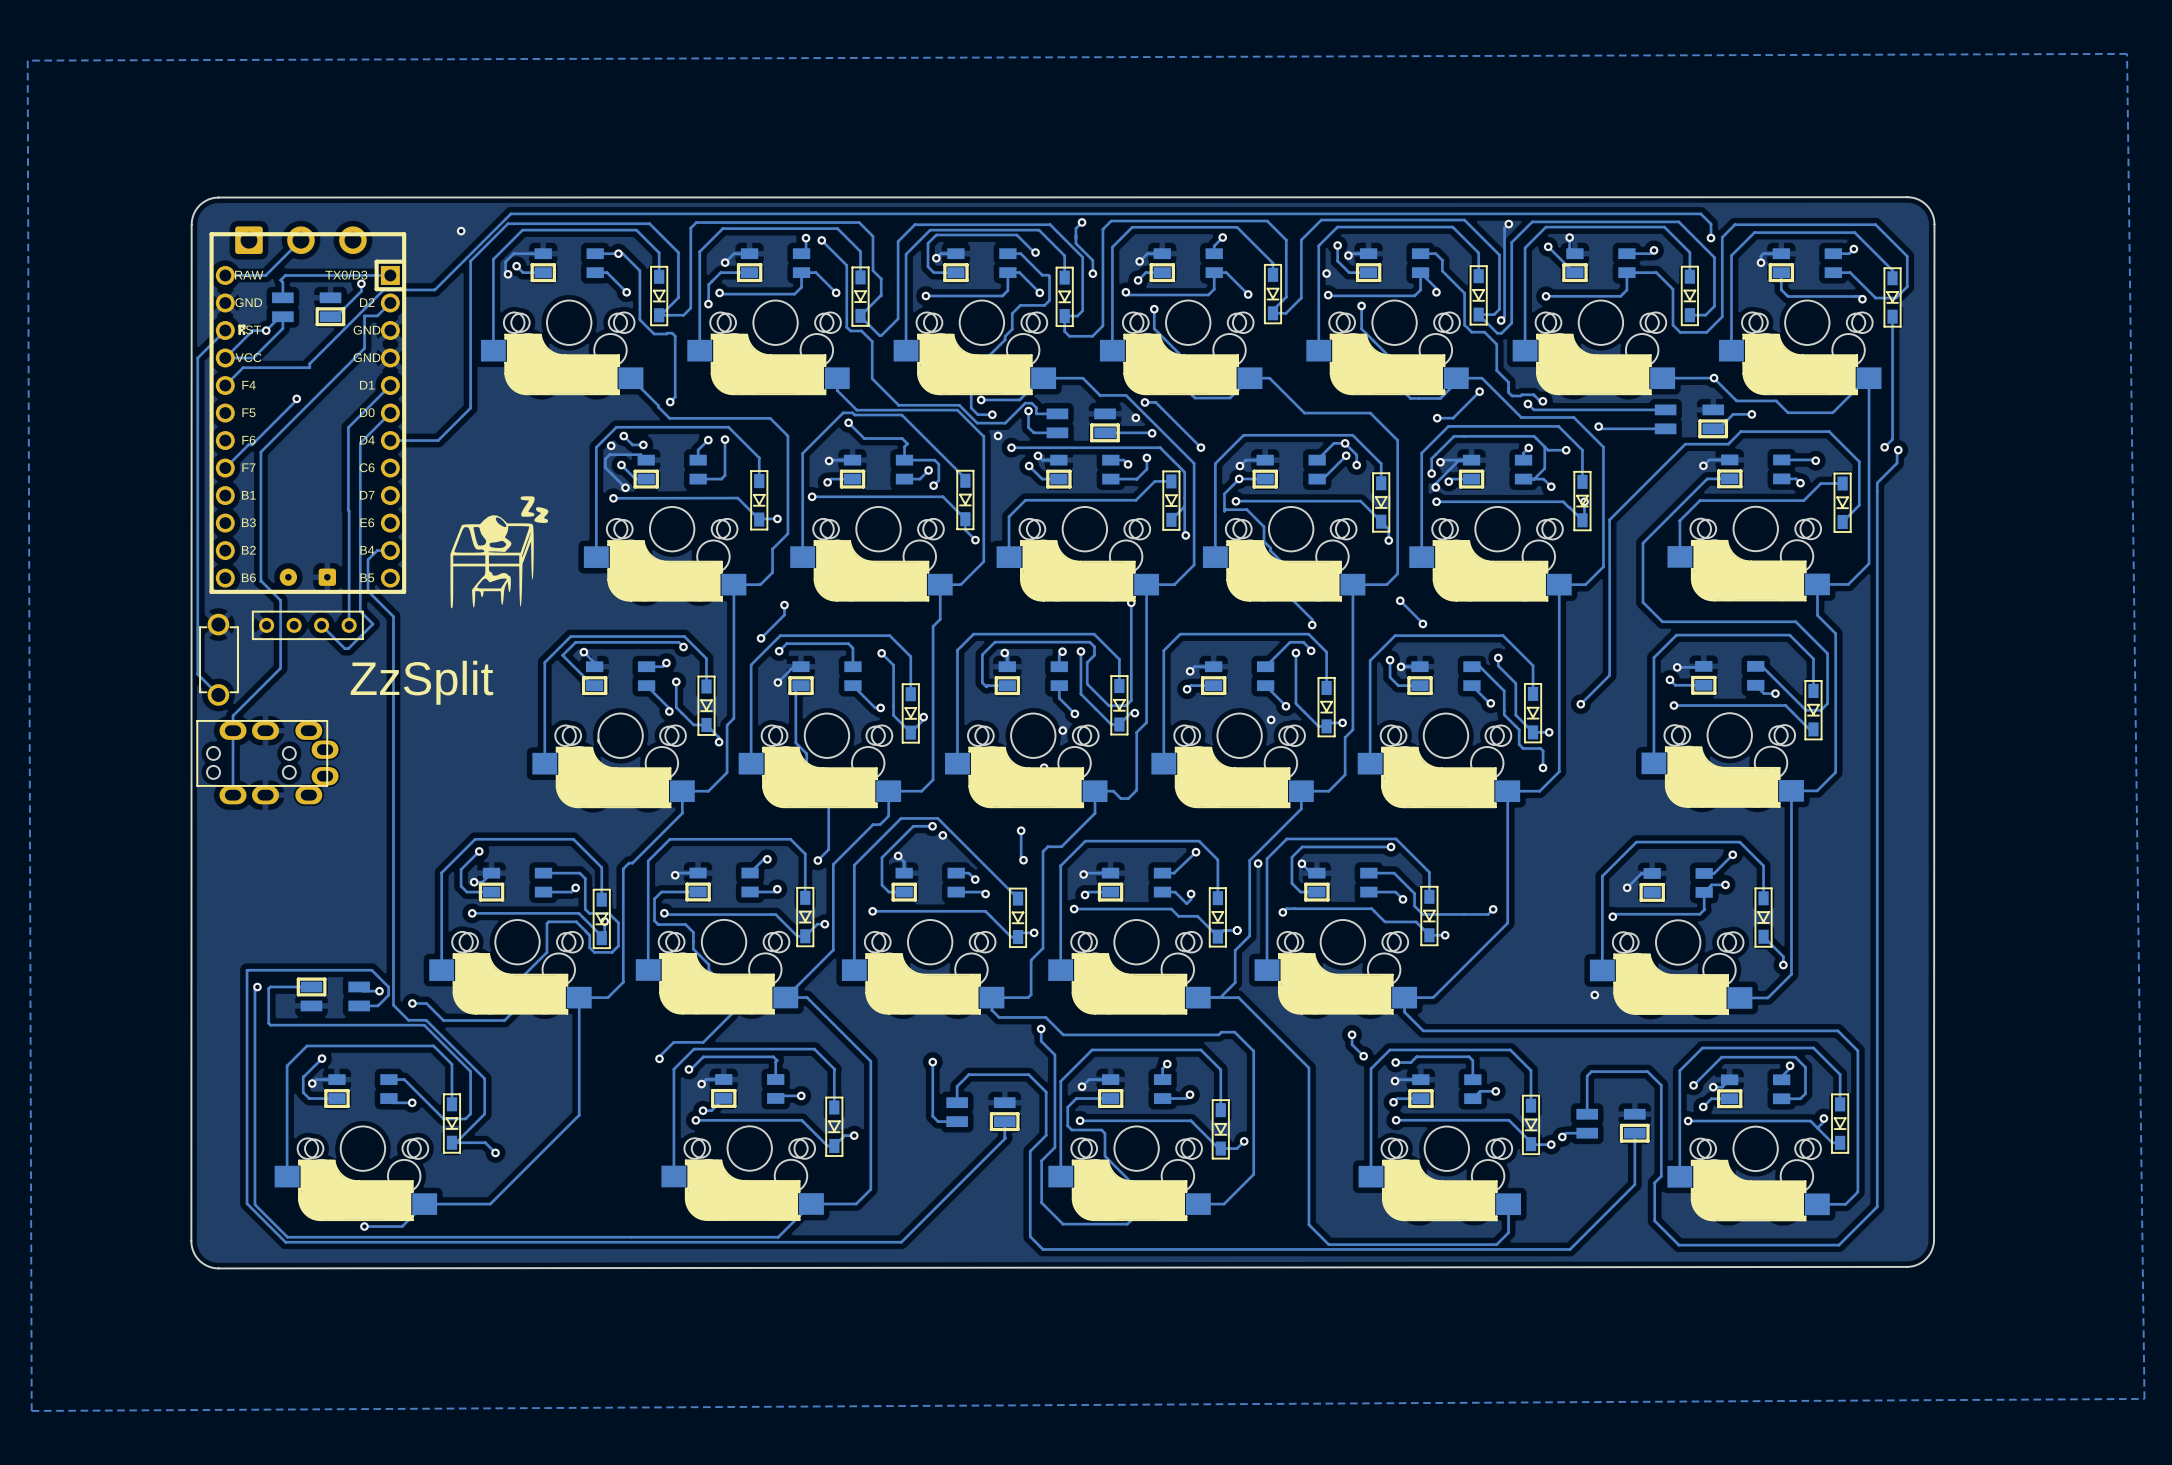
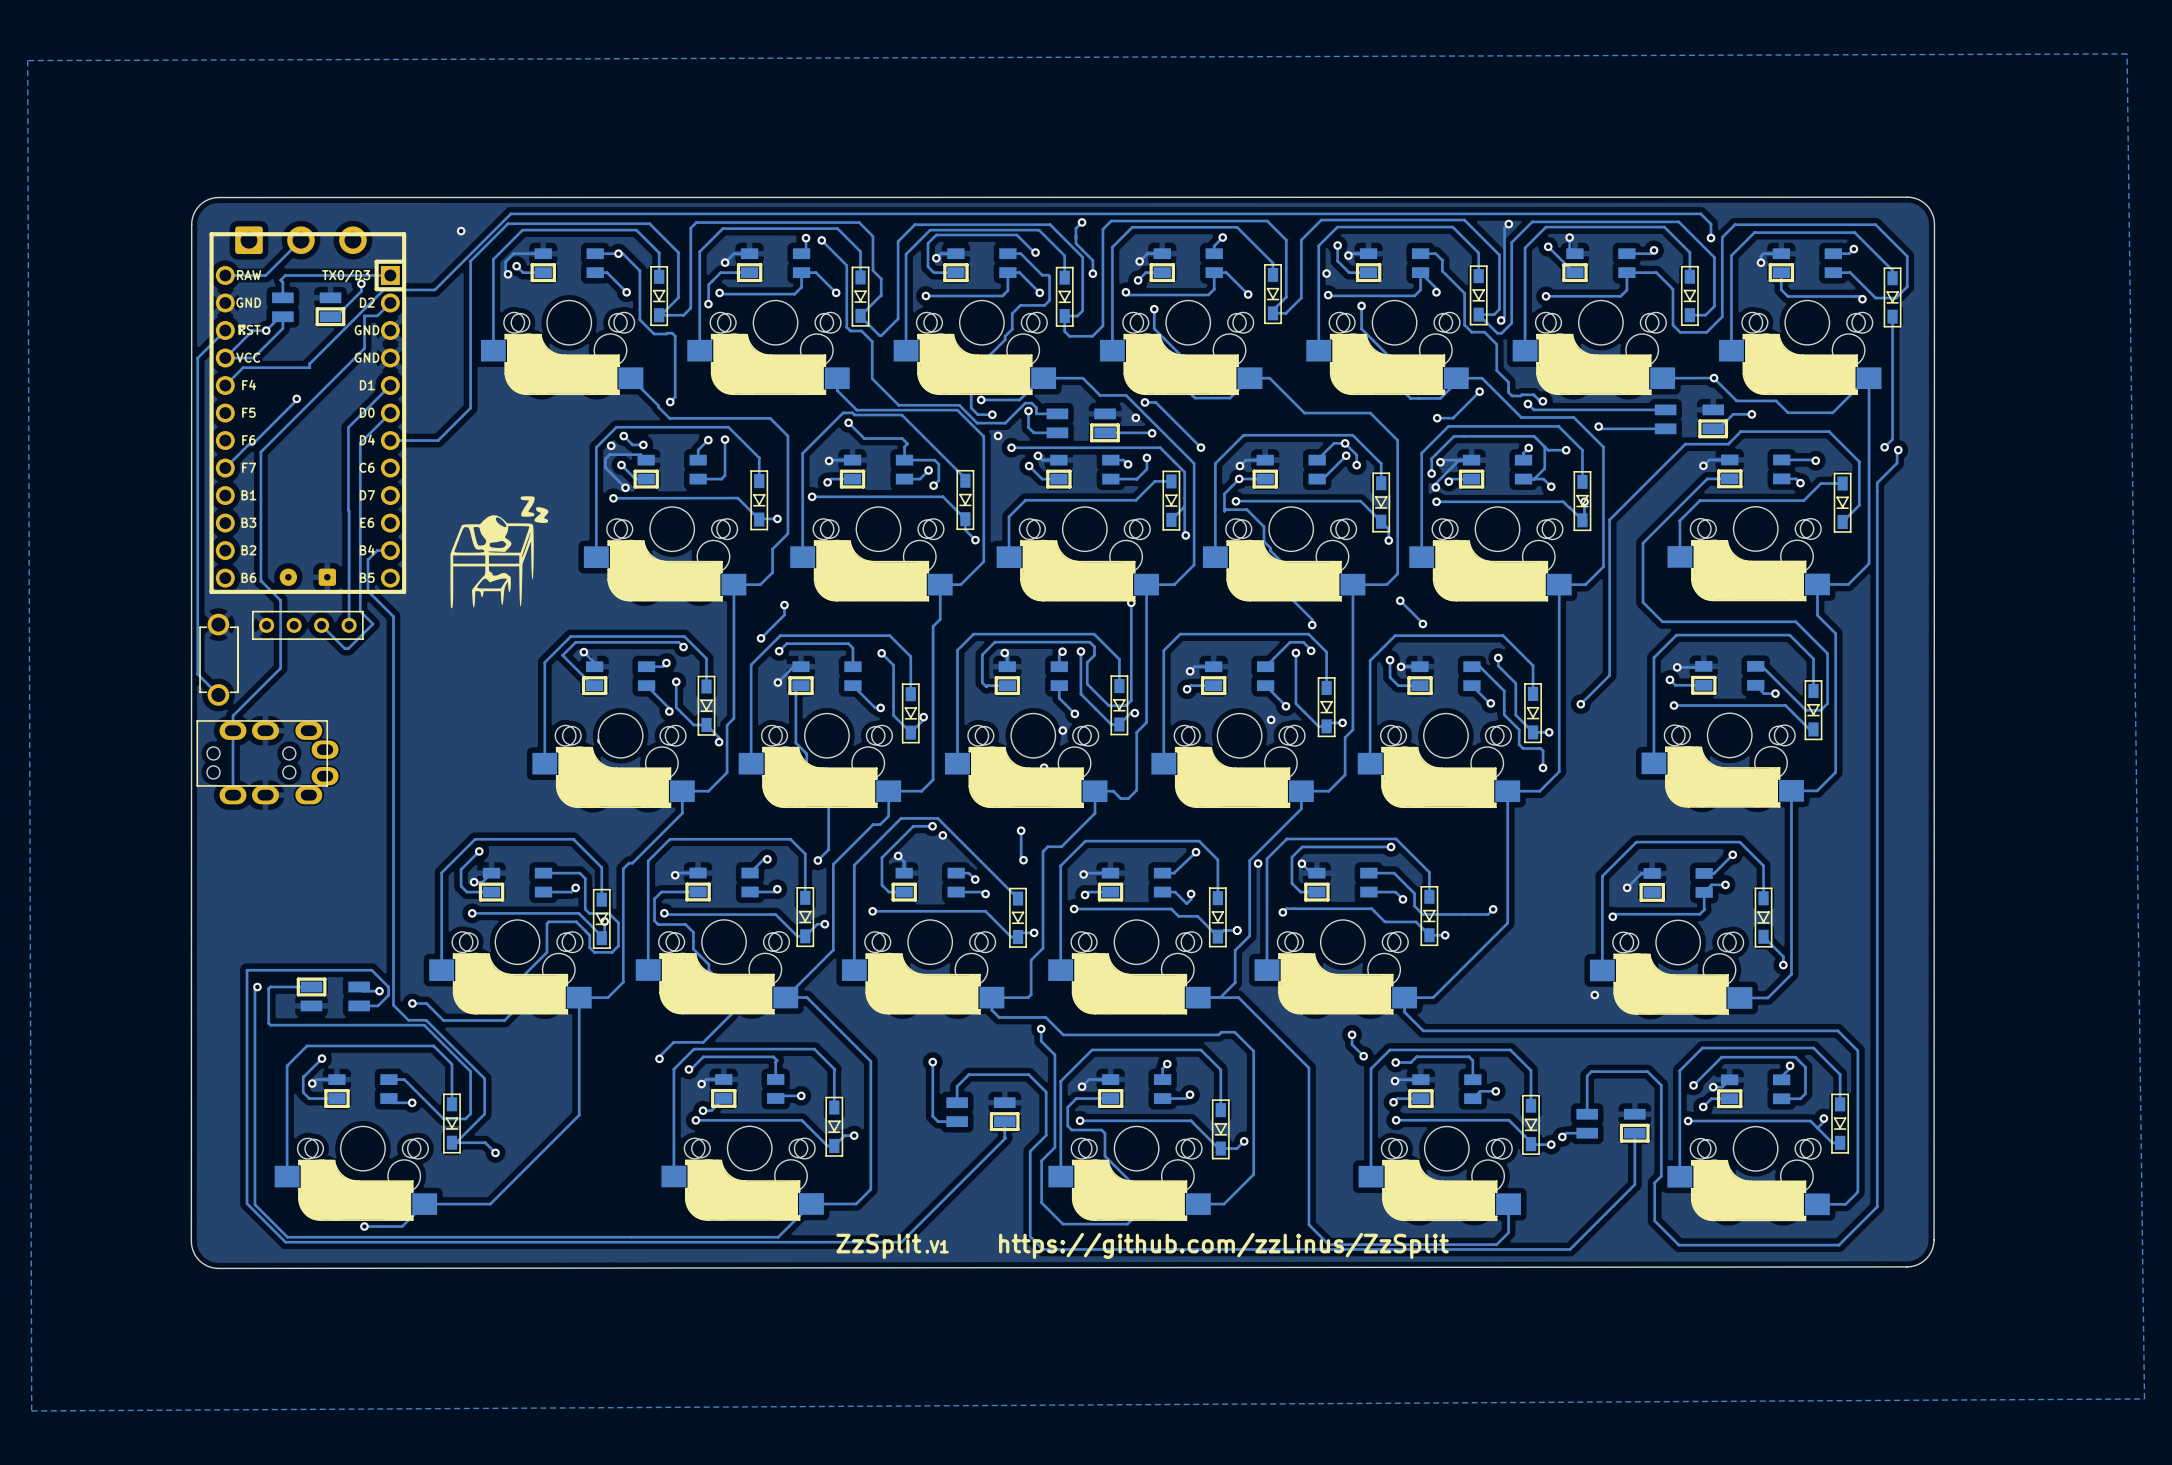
ZzSplit name: ZzSplit (421, 682) -> .V1 (937, 1246)
text: none -> ZzSplit https://github.com/zzLinus/ZzSplit (1142, 1245)

